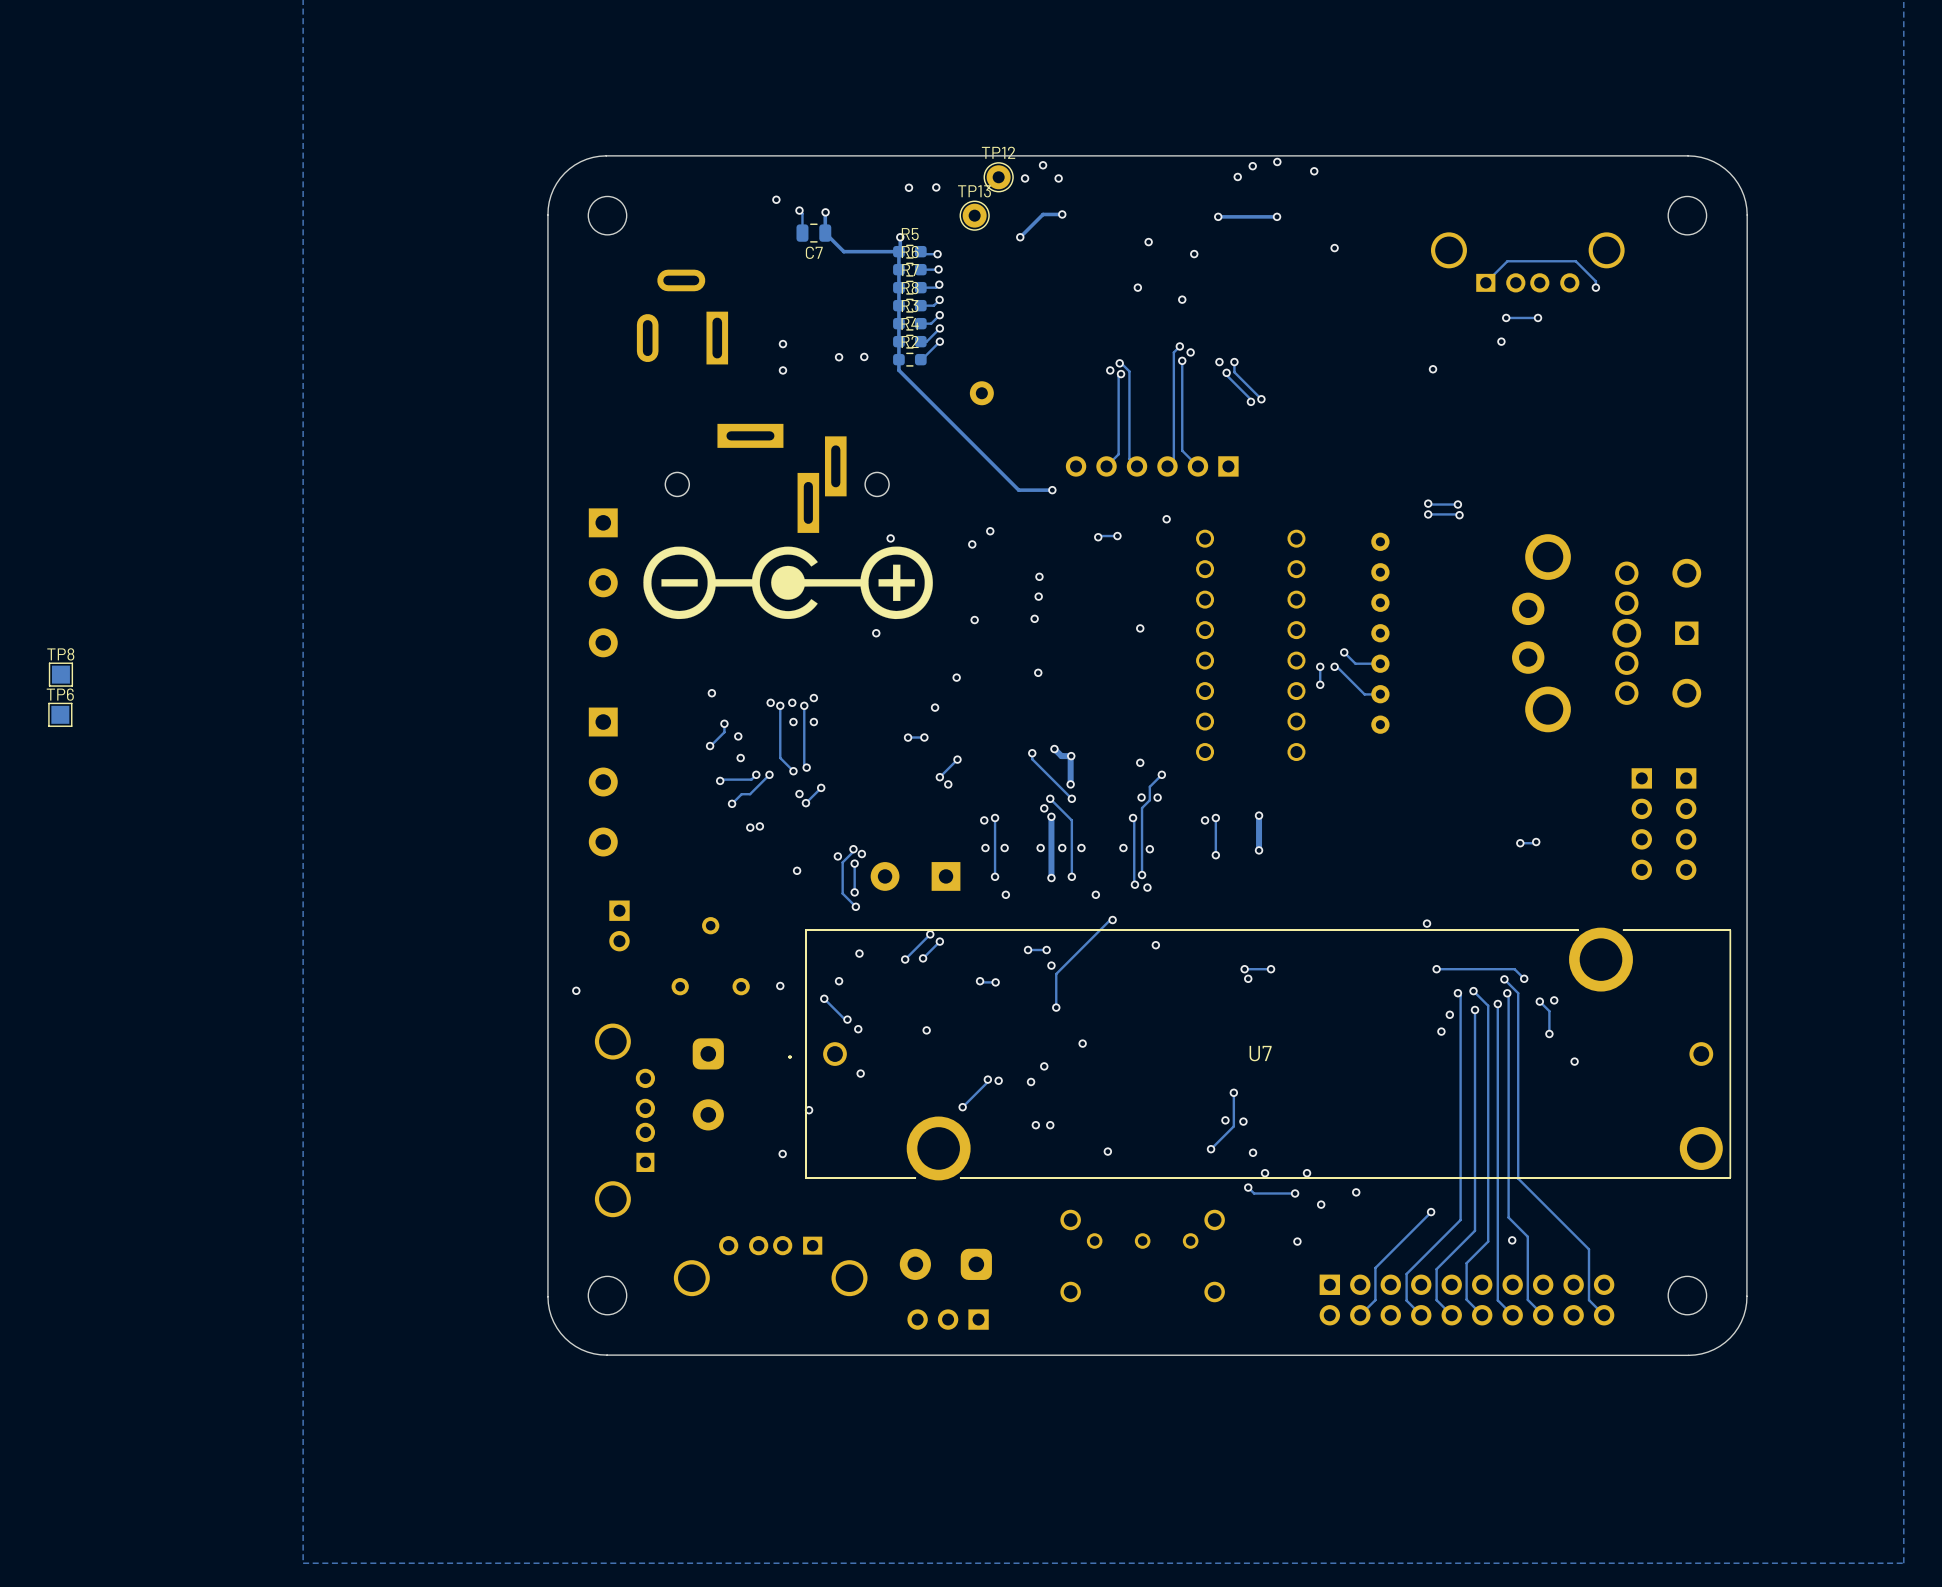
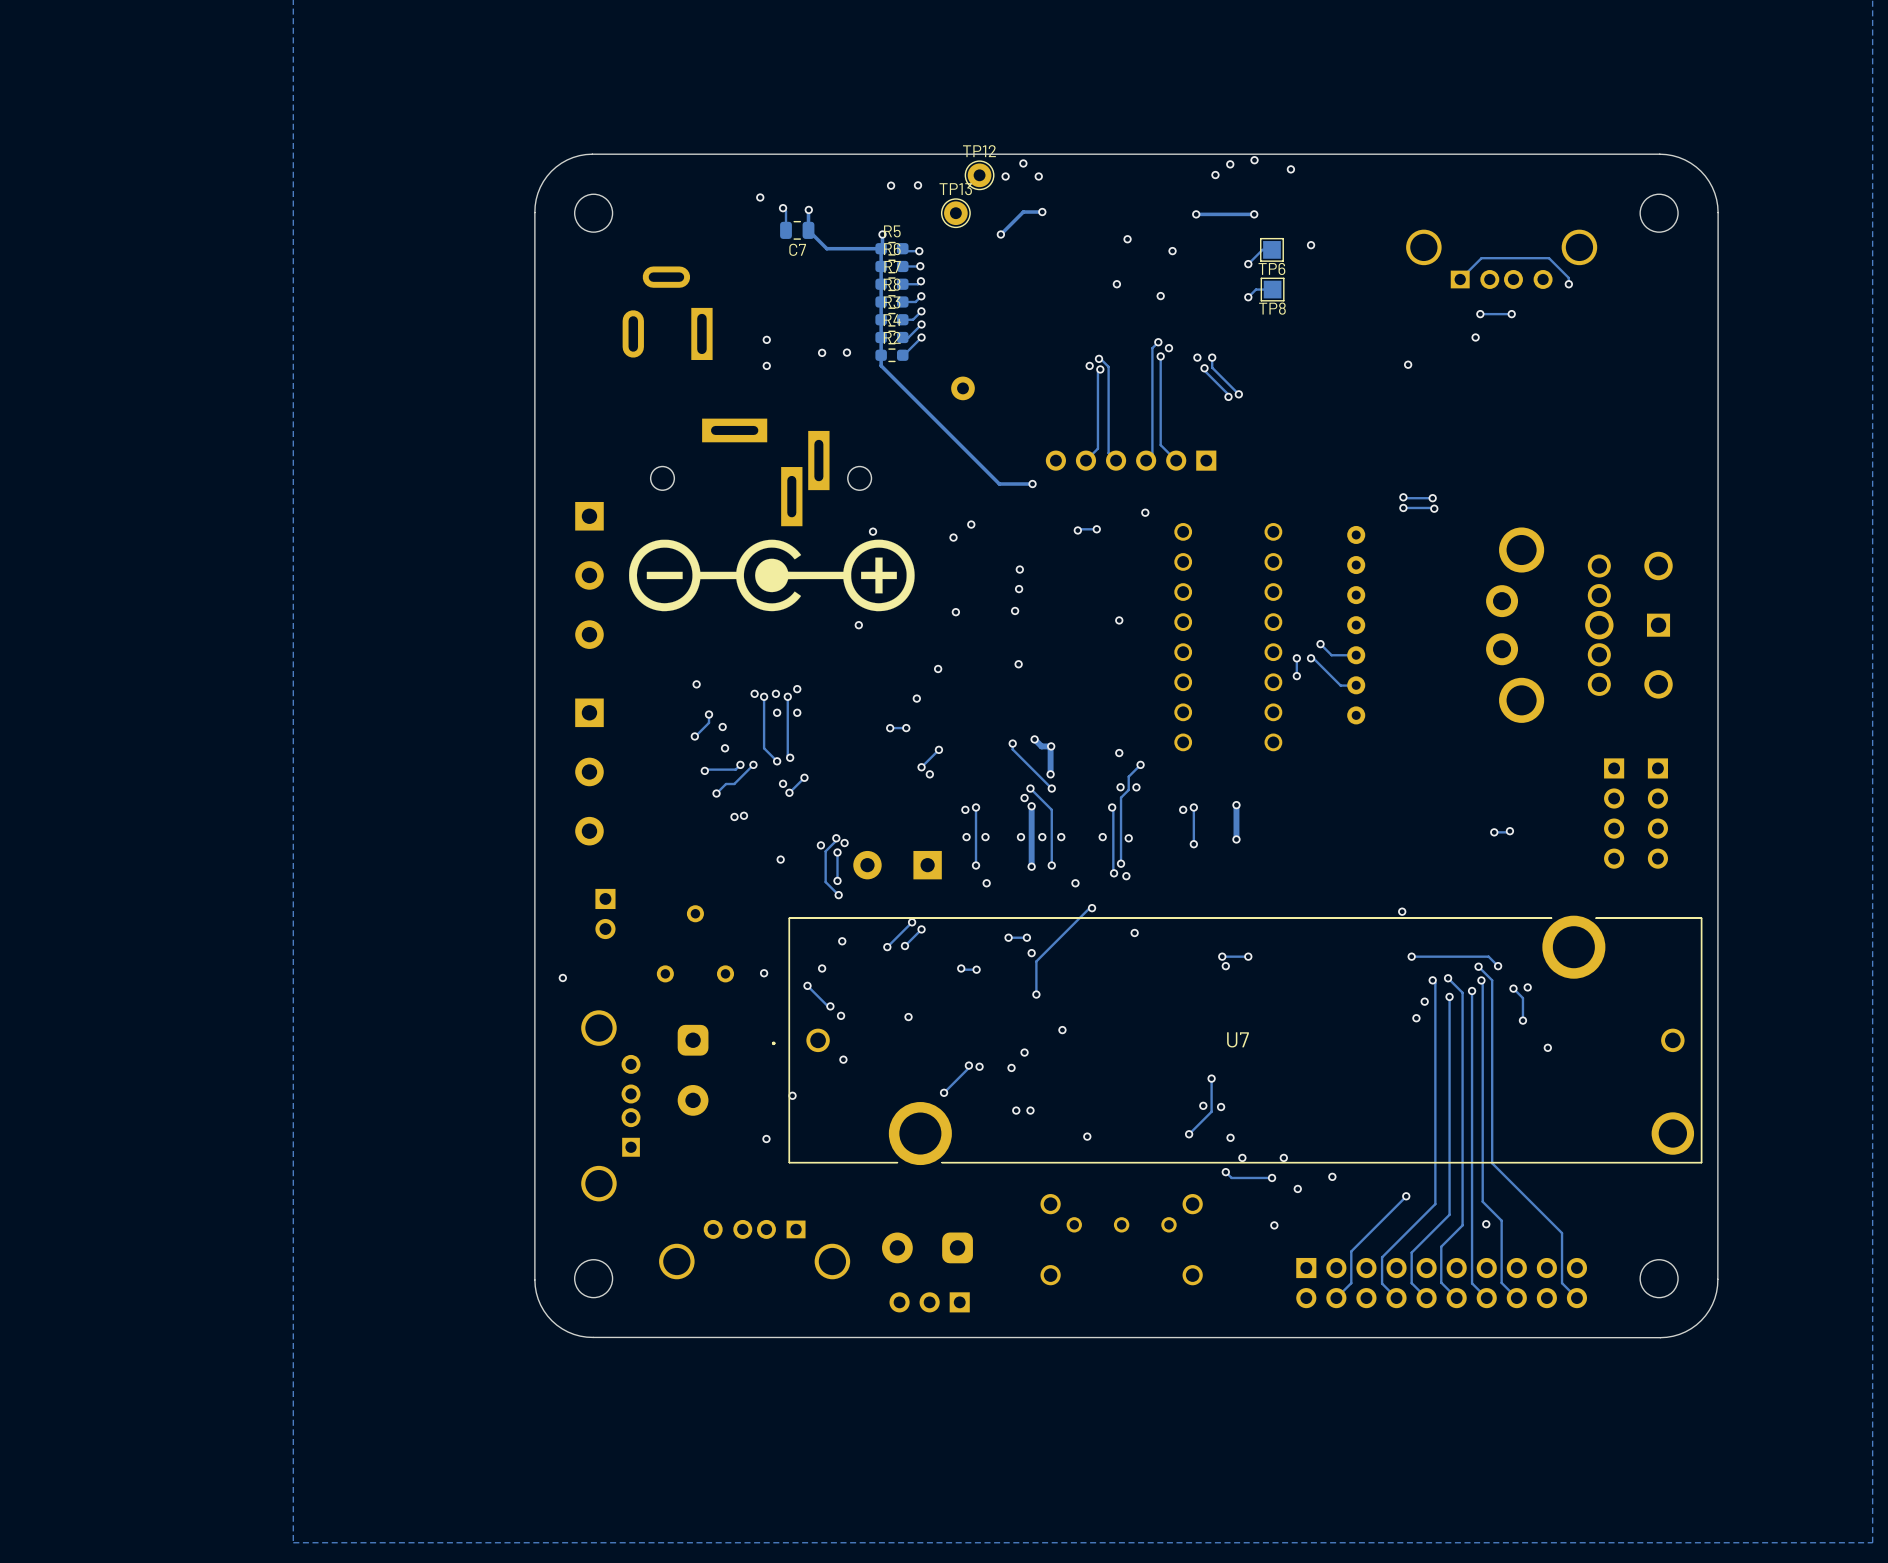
track: none -> (1271, 249) (1262, 249) (1248, 264)
via: none -> (1248, 264)
track: none -> (1272, 289) (1256, 289) (1248, 297)
via: none -> (1248, 297)
TP8 name position: TP8 (60, 654) -> TP8 (1272, 308)
TP8 position: (60, 674) -> (1272, 289)
TP6 name position: TP6 (60, 694) -> TP6 (1271, 268)
TP6 position: (60, 714) -> (1271, 249)

